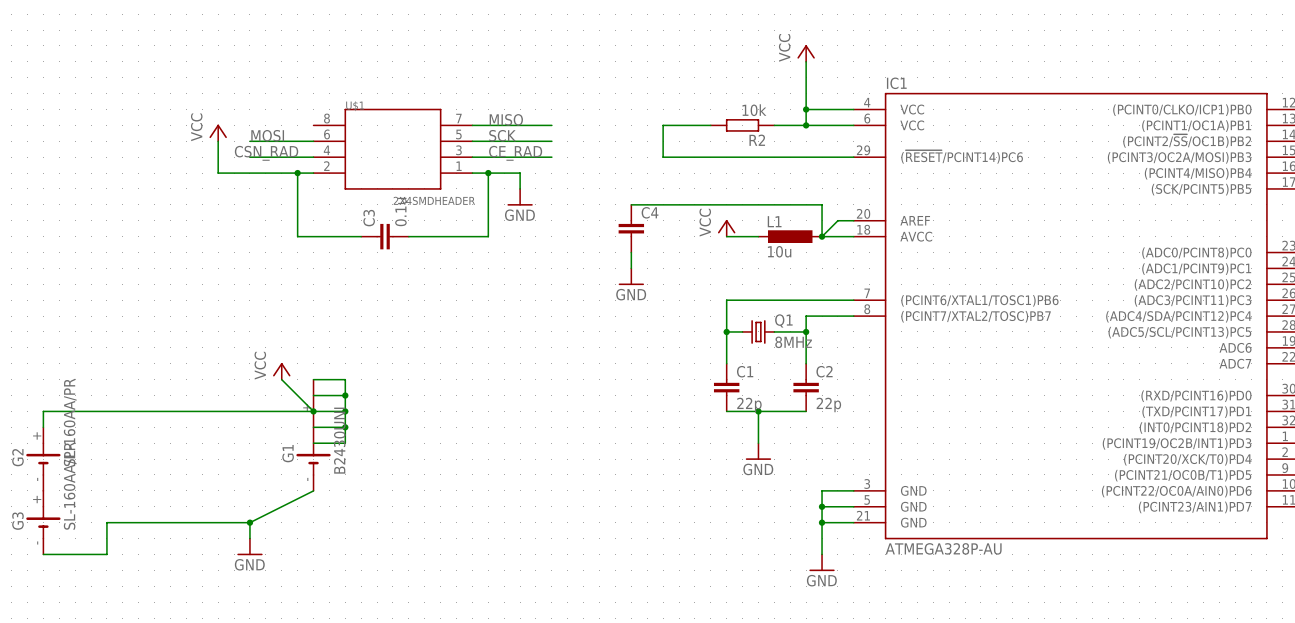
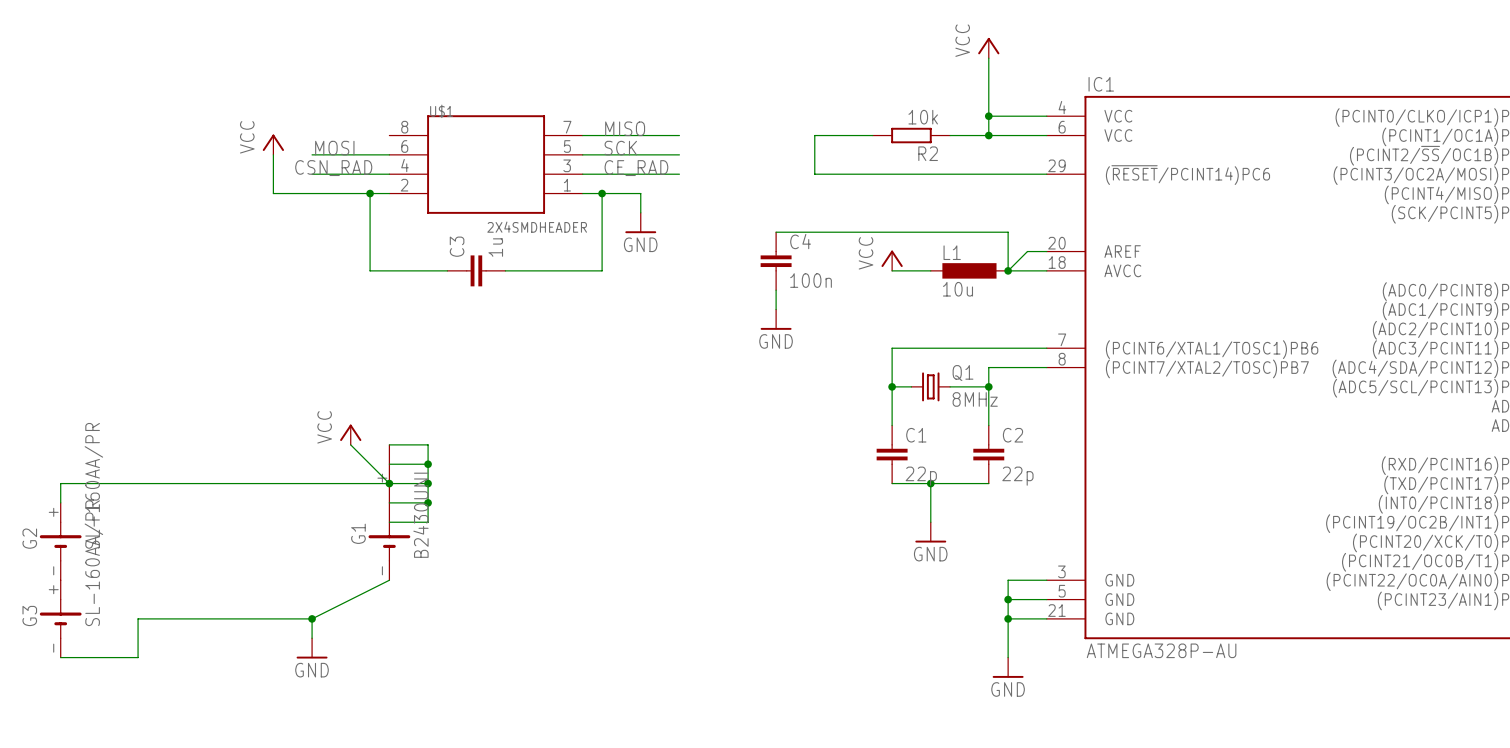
C3 value: 0.1u (400, 212) -> 1u (495, 247)
C4 value: none -> 100n (811, 280)

